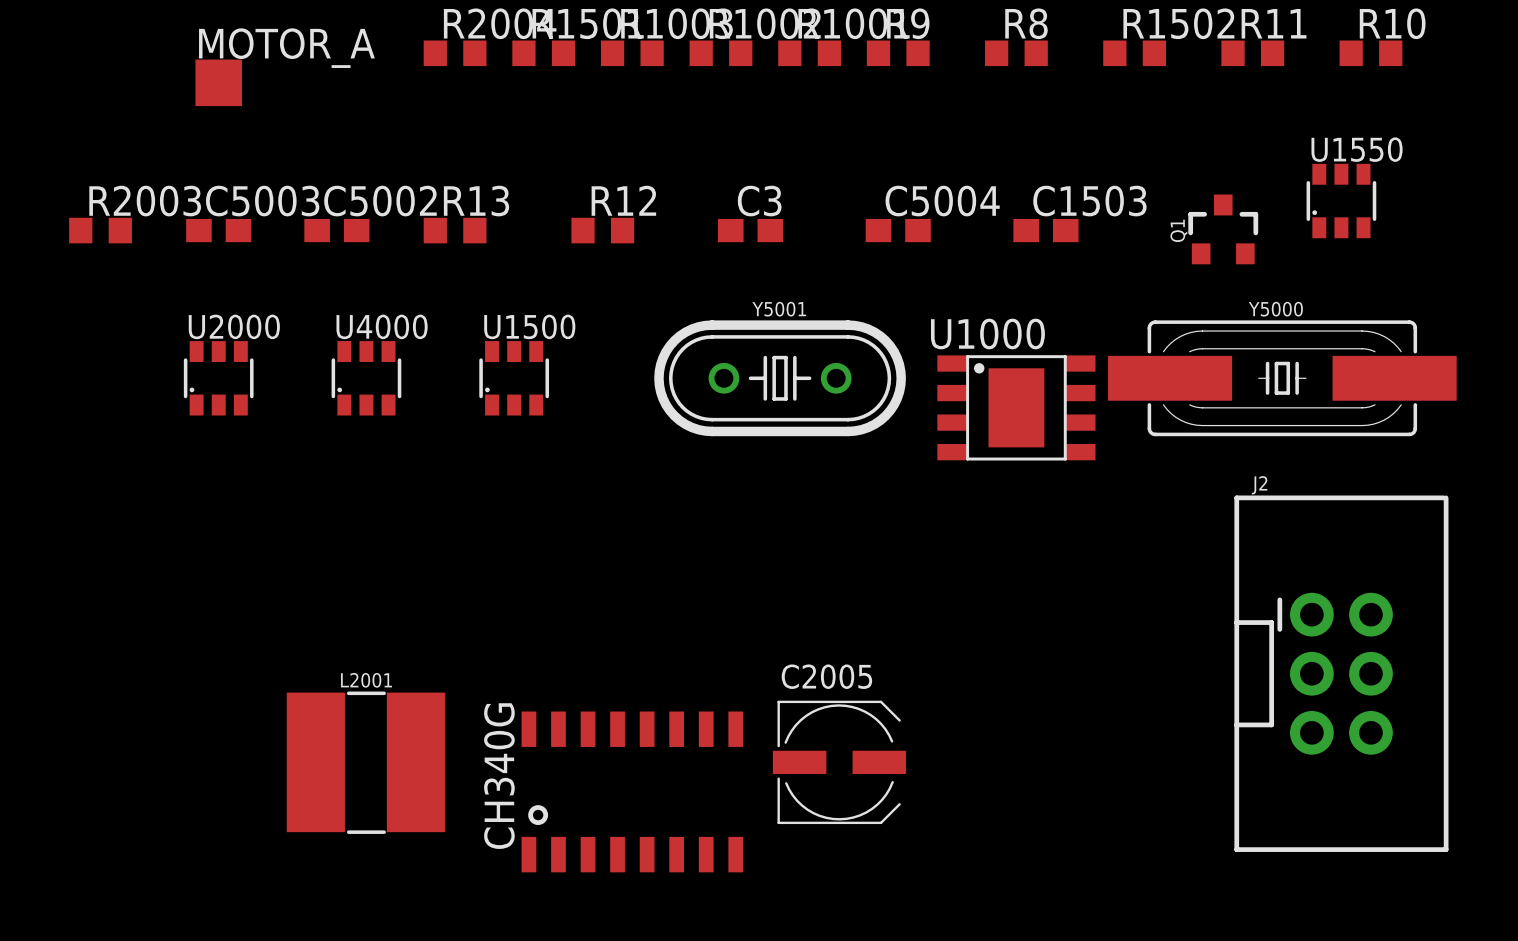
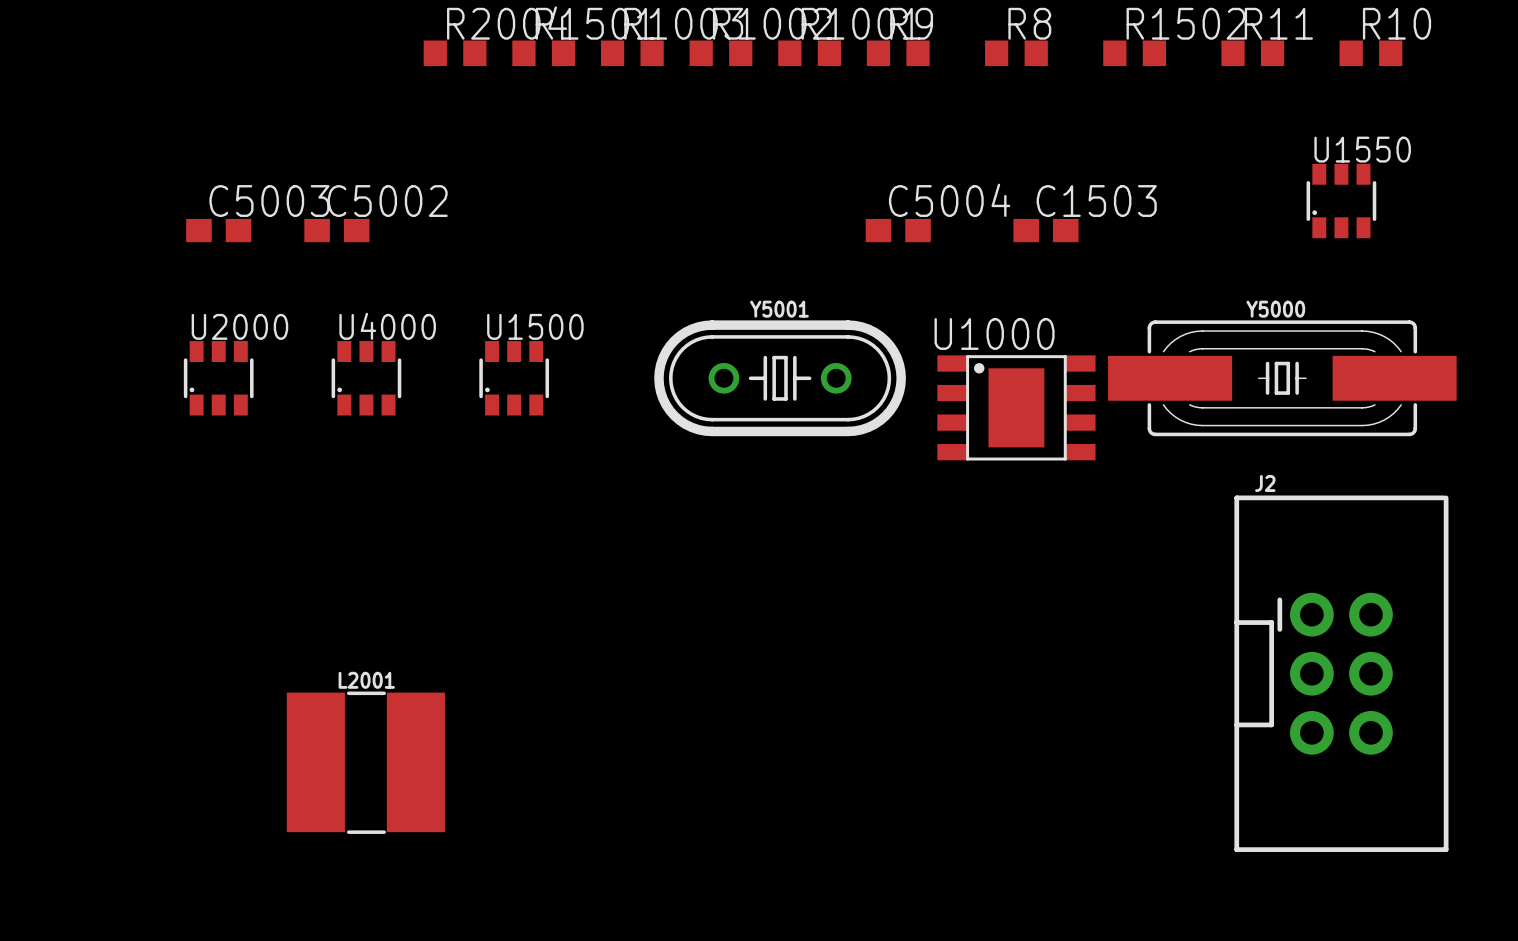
MOTOR_A: (218, 82) -> none
Q1: (1223, 229) -> none
R2003: (100, 230) -> none
R13: (455, 230) -> none
R12: (602, 230) -> none
C3: (750, 230) -> none
C2005: (839, 762) -> none
part: (632, 791) -> none

